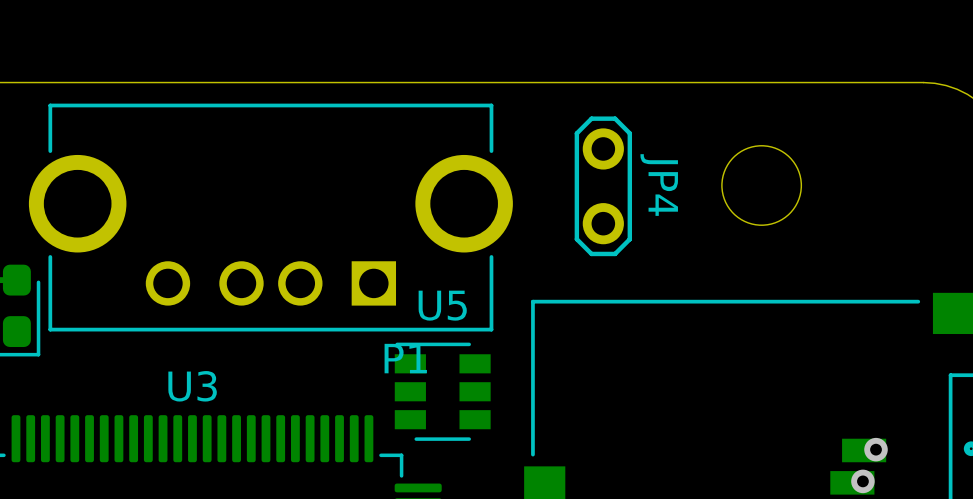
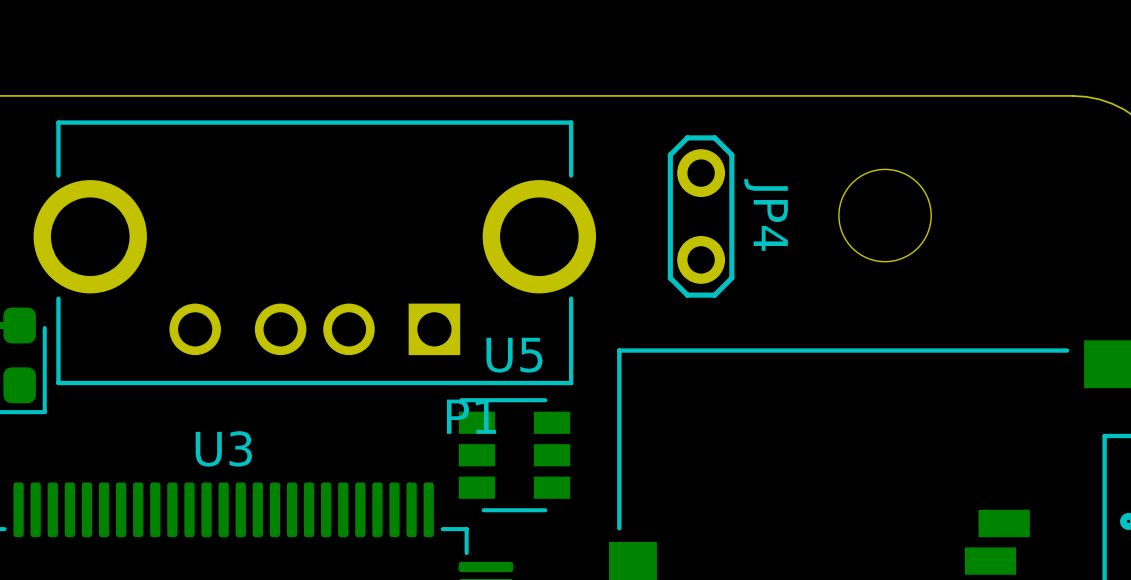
via: (876, 449) -> none
via: (862, 481) -> none

